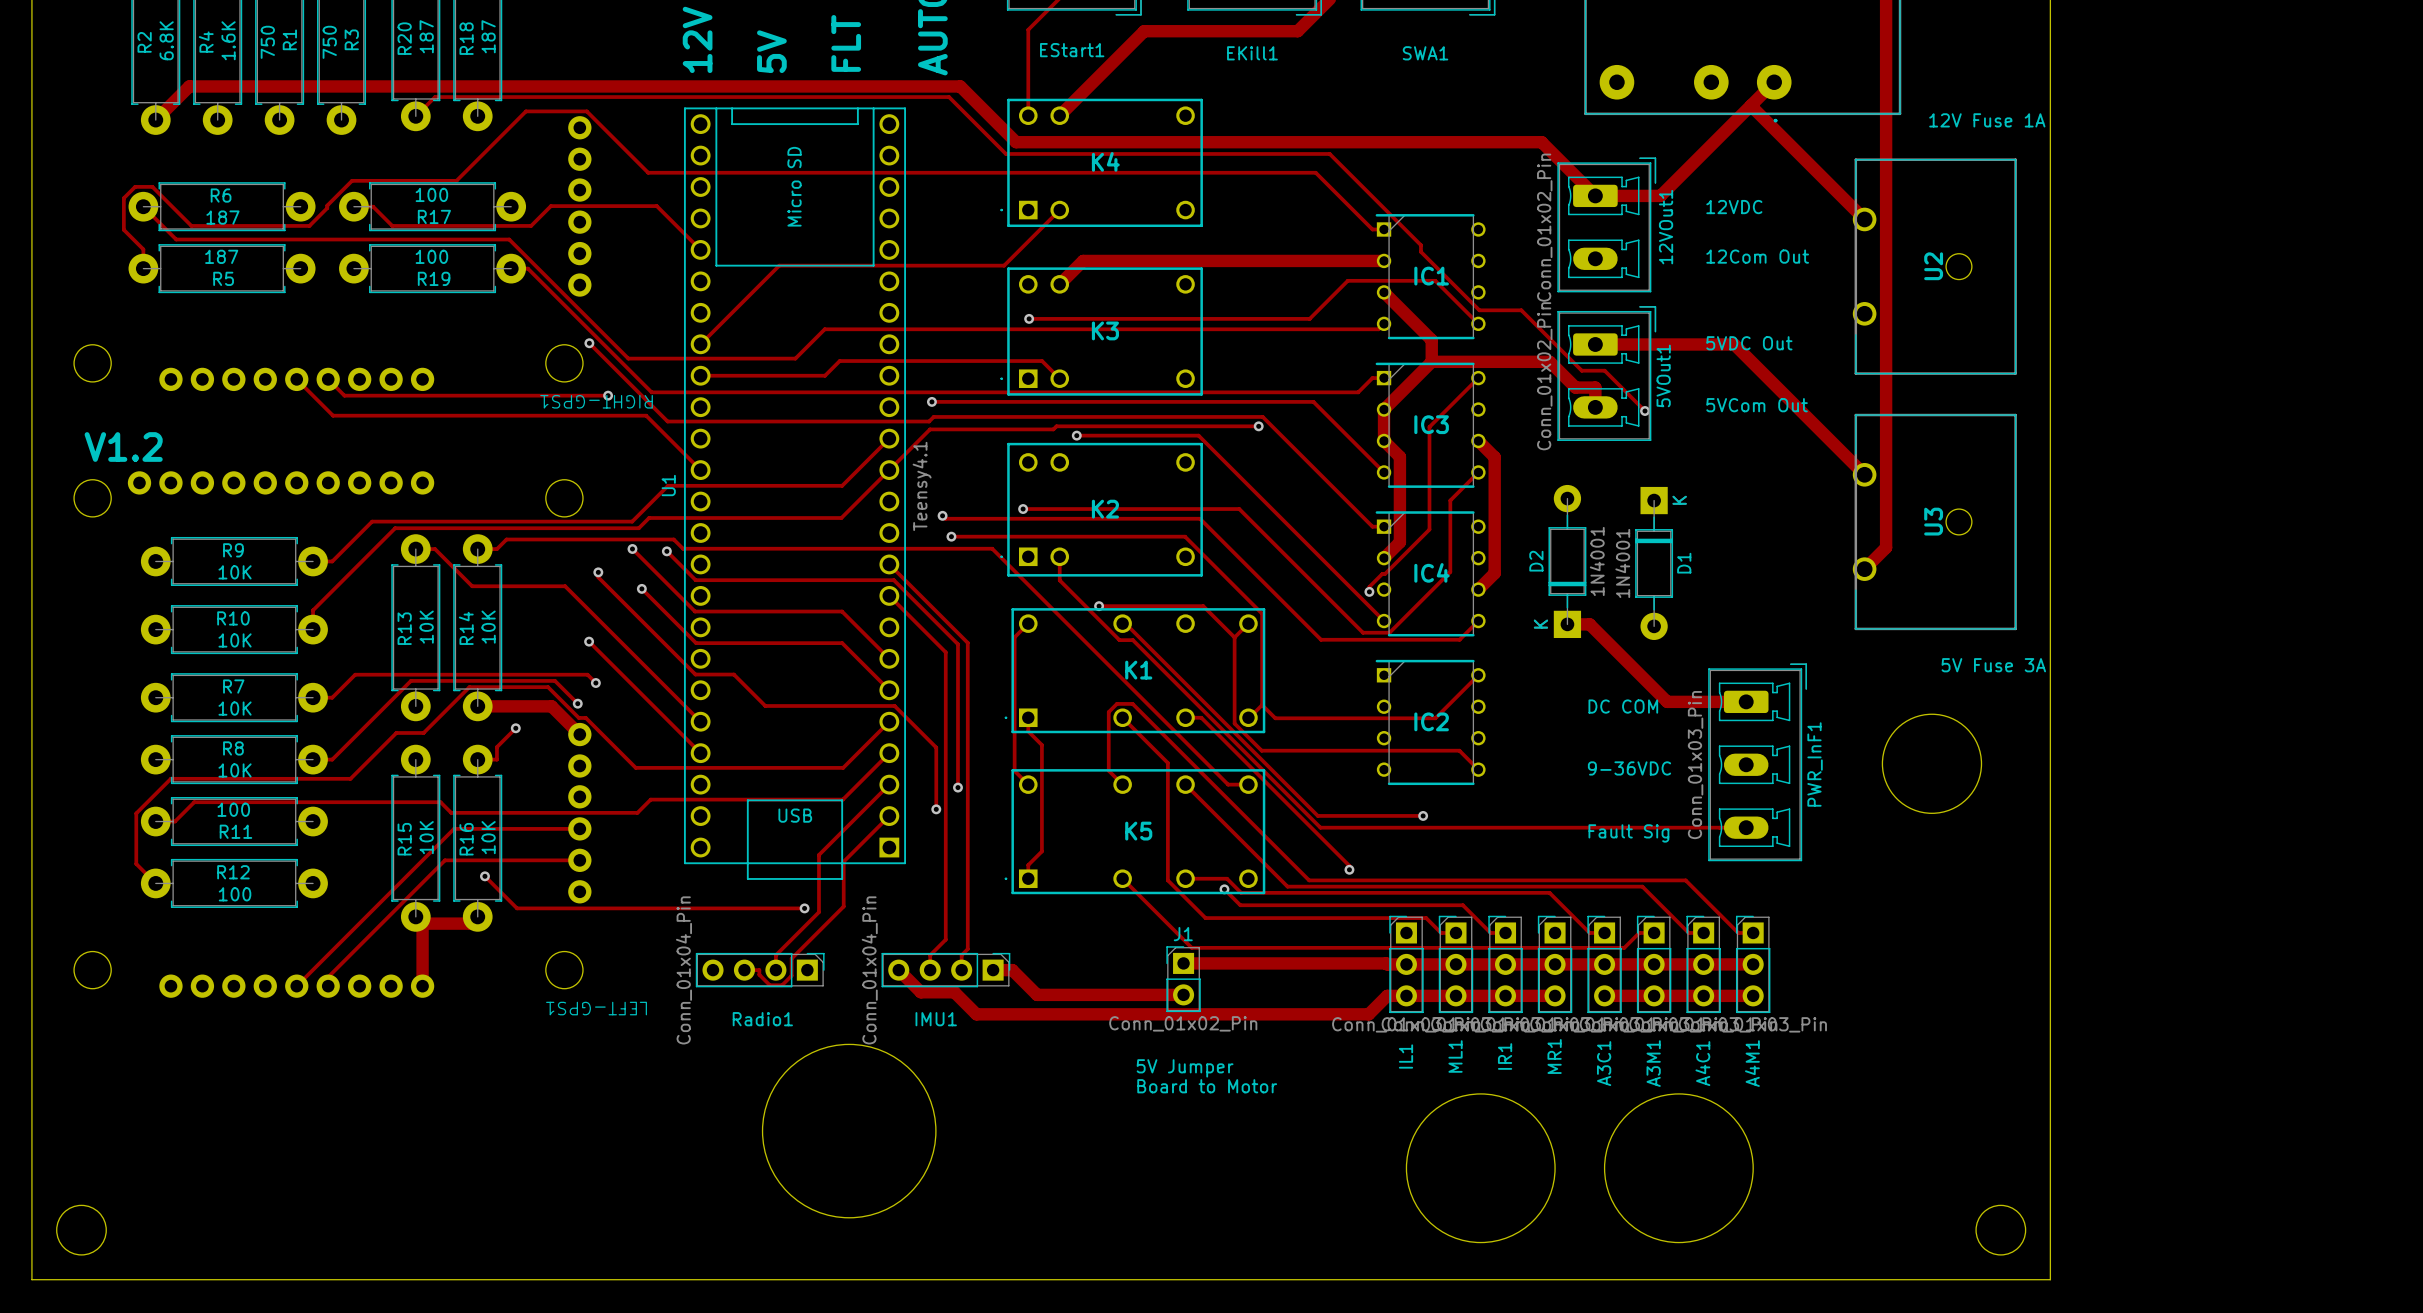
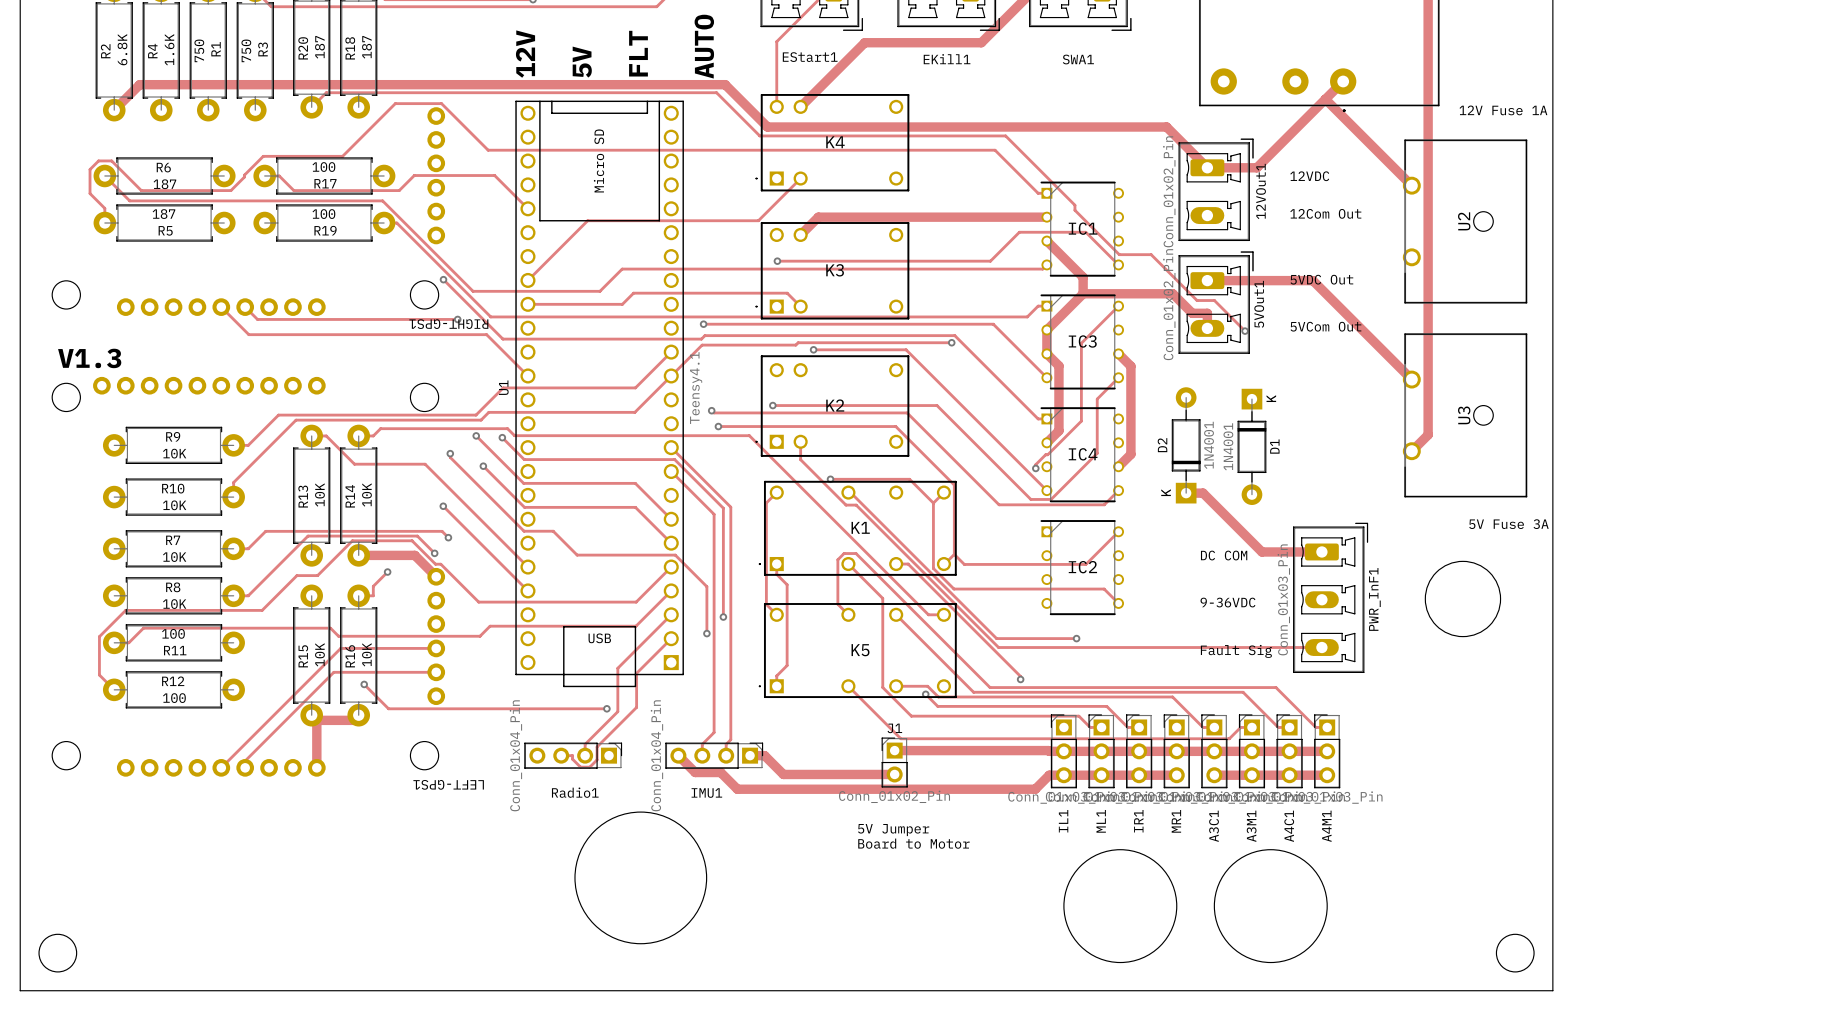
text: V1.2 (123, 447) -> V1.3 (89, 358)

